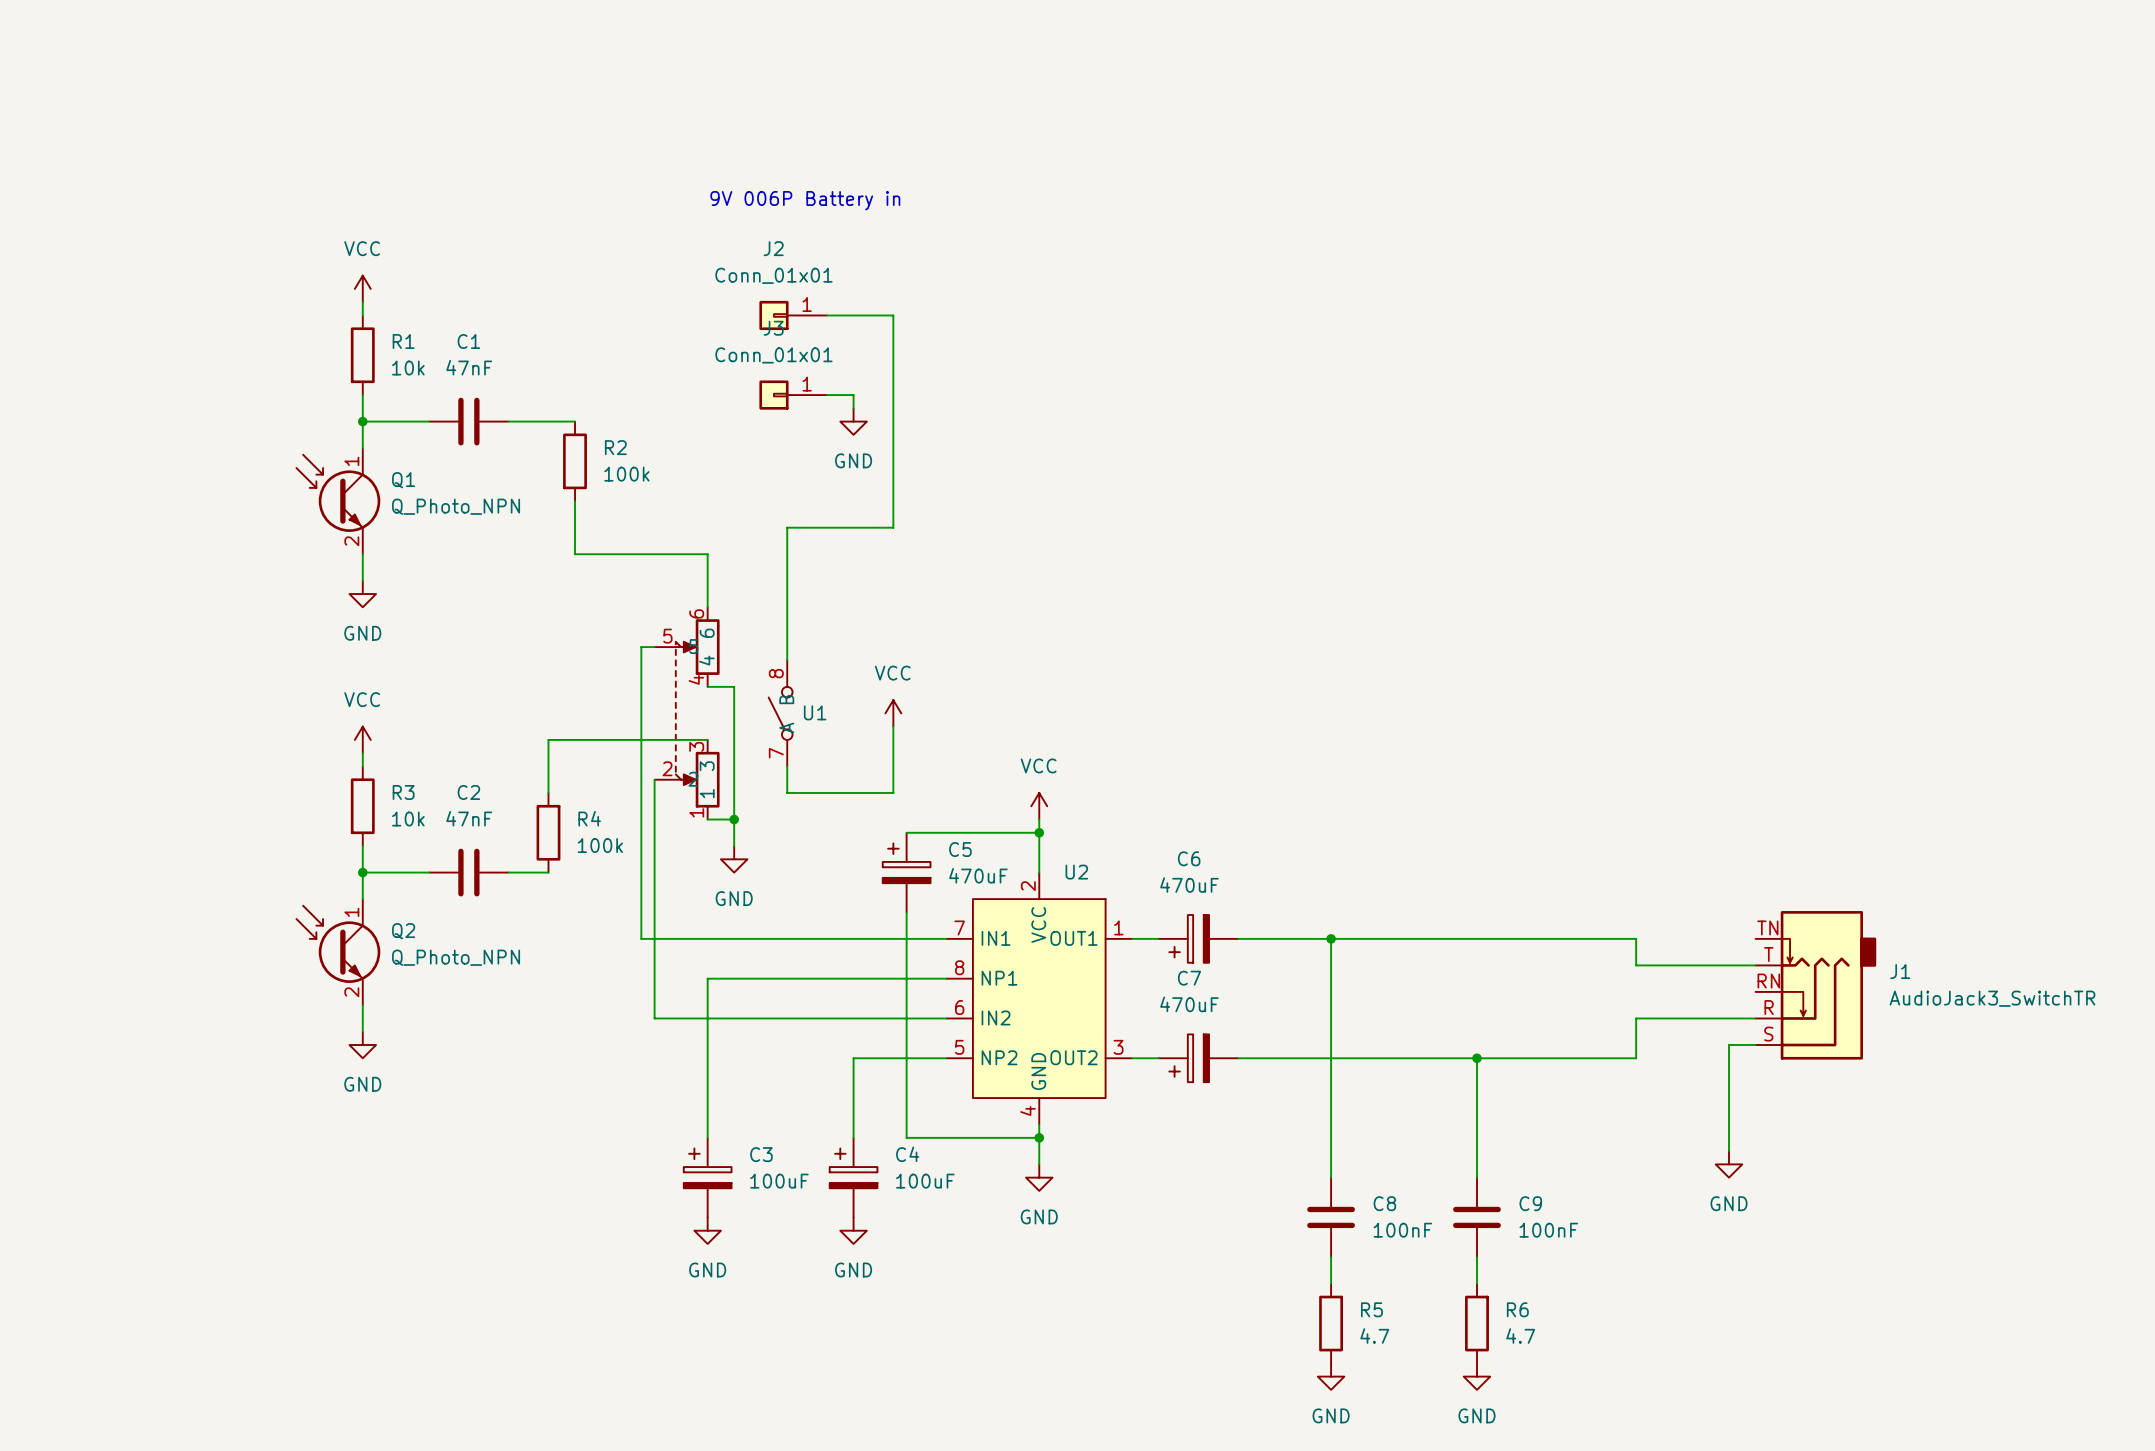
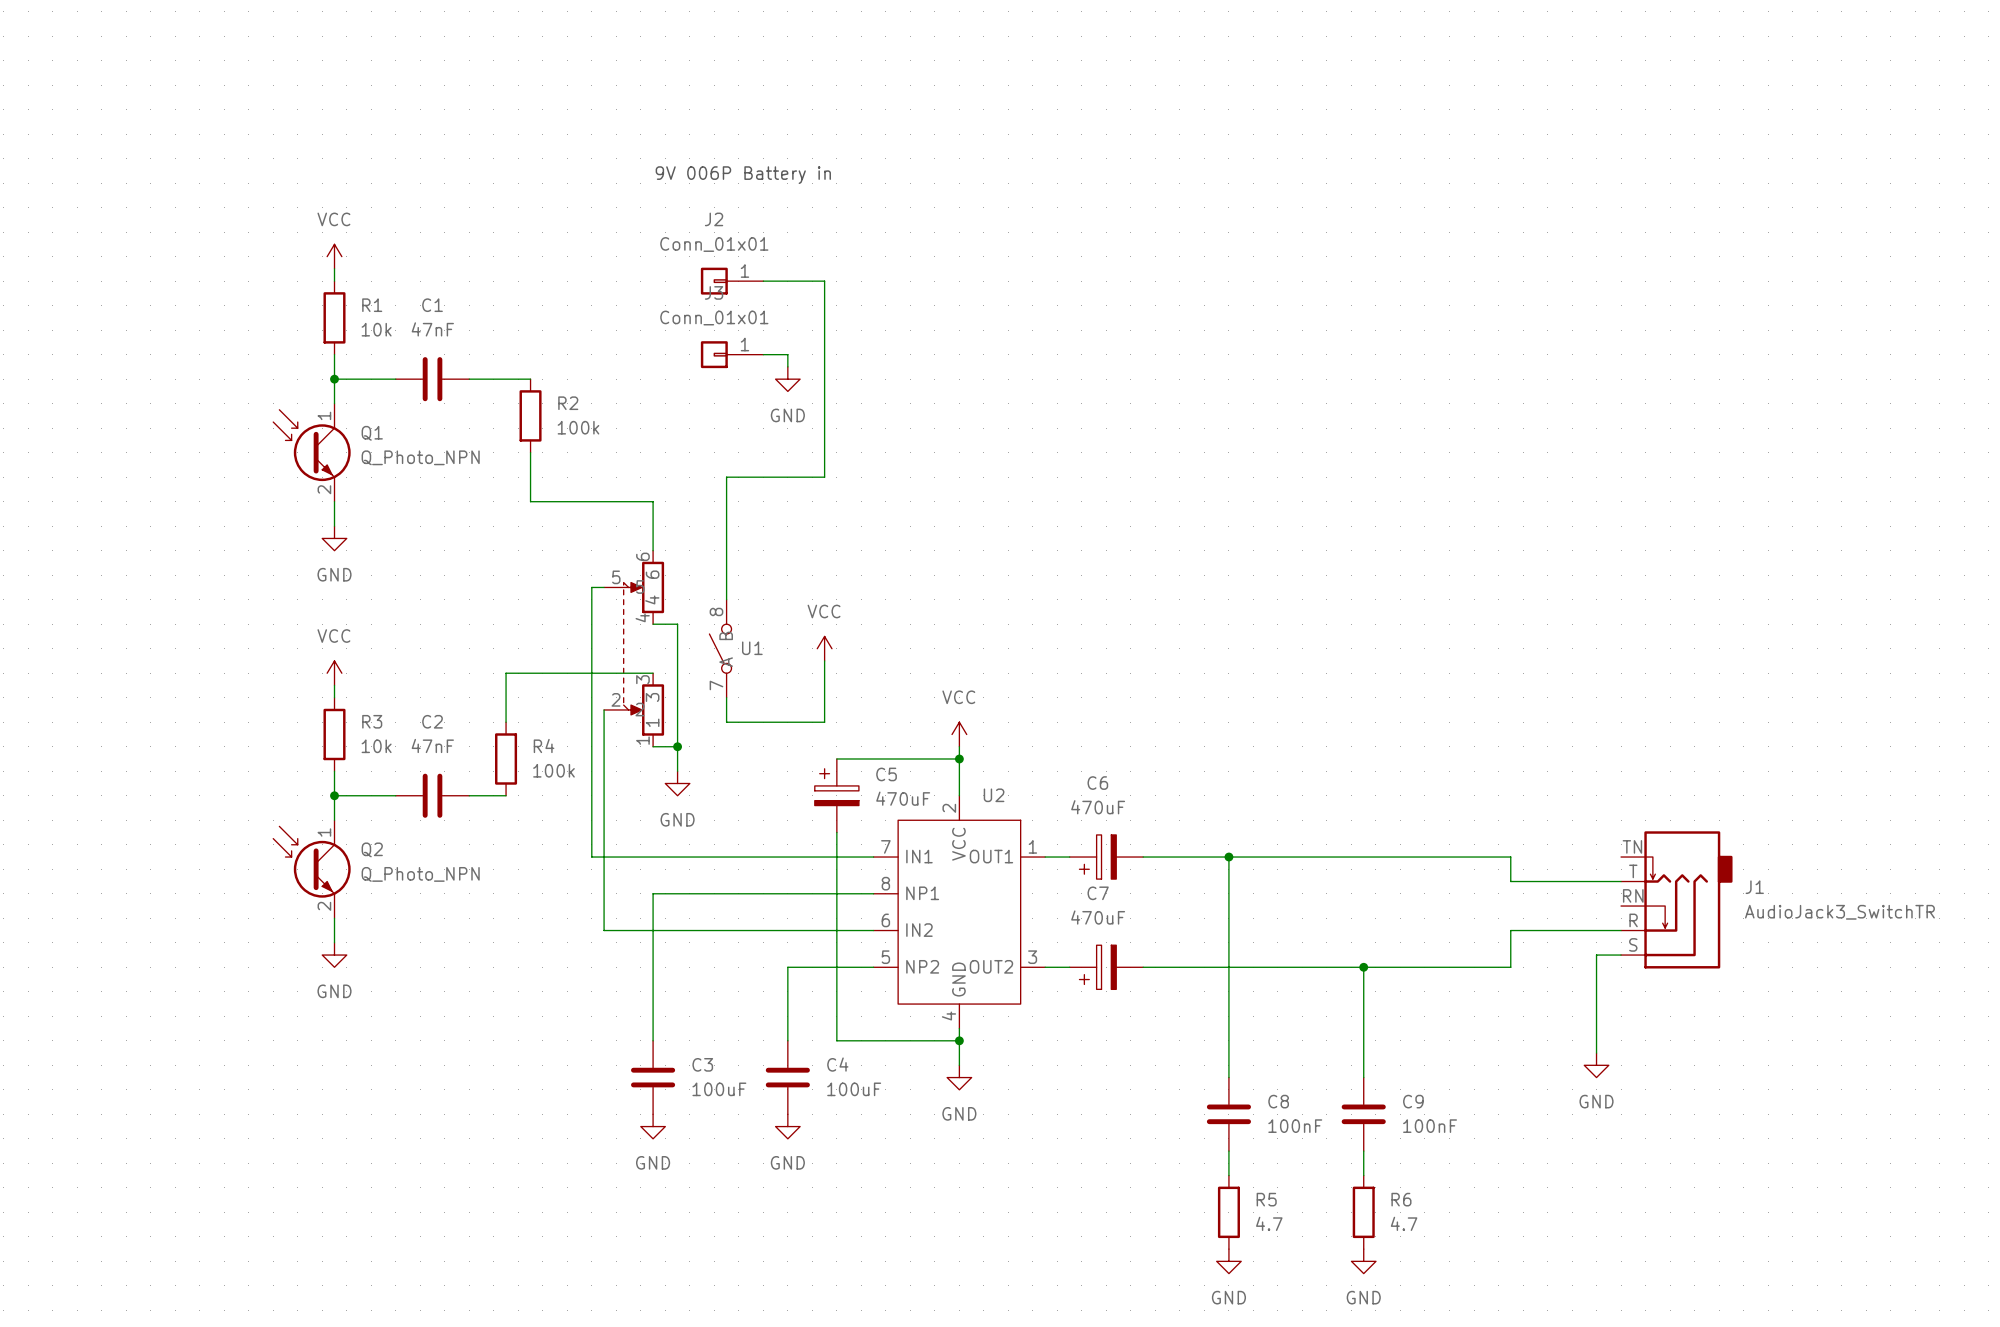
C3 symbol: [683, 1137, 732, 1218] -> [631, 1040, 676, 1115]
C4 symbol: [829, 1137, 878, 1218] -> [765, 1040, 810, 1115]

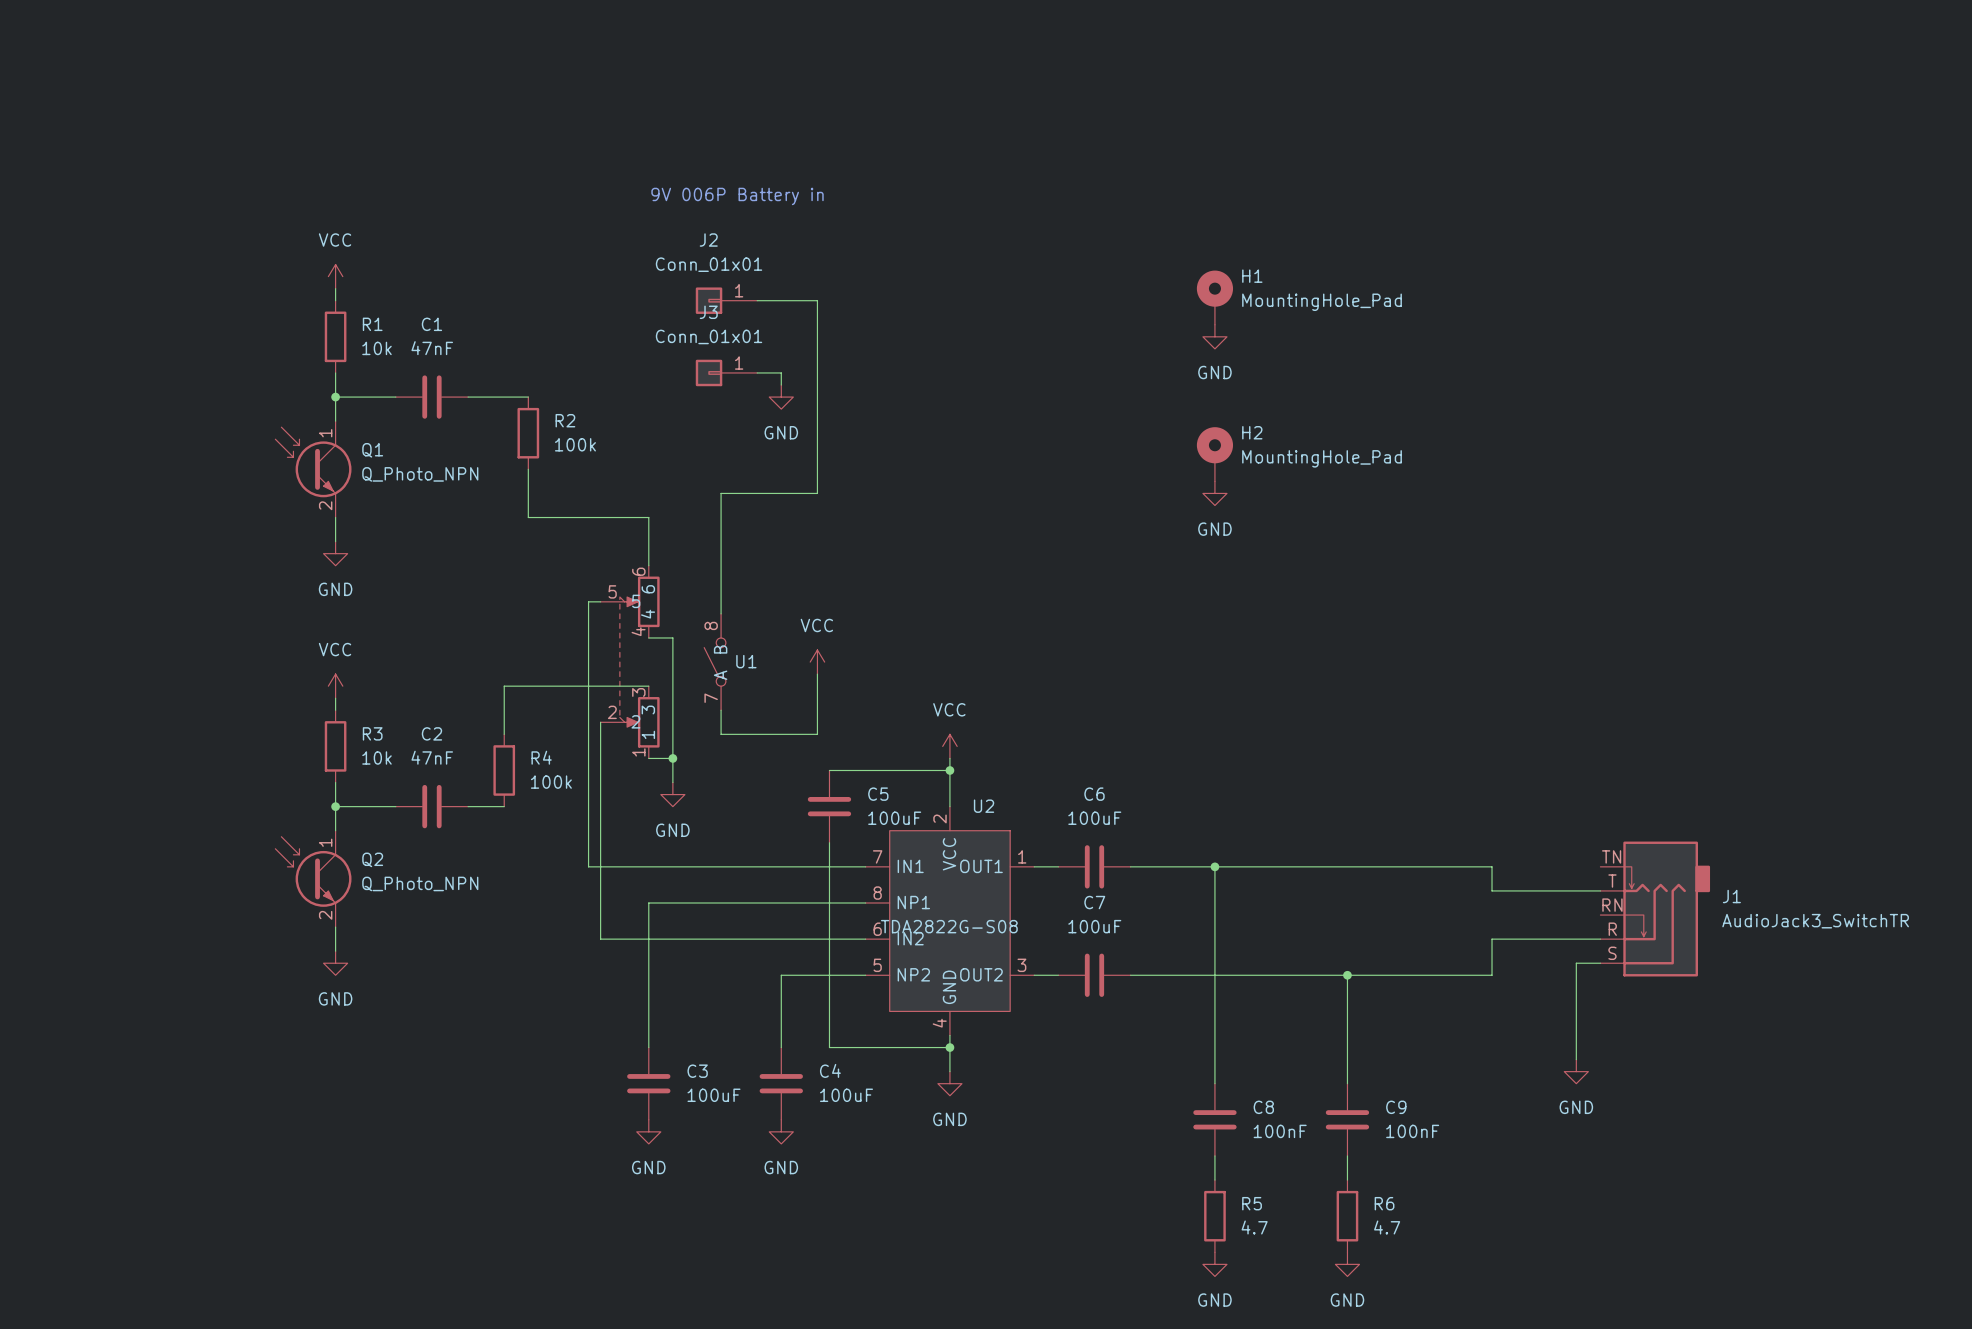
H1: none -> MountingHole_Pad (1214, 297)
power symbol: none -> GND (1214, 336)
H2: none -> MountingHole_Pad (1214, 454)
power symbol: none -> GND (1214, 493)
C5 symbol: [814, 758, 859, 833] -> [807, 770, 852, 843]
C5 value: 470uF (903, 798) -> 100uF (894, 818)
C6 value: 470uF (1098, 807) -> 100uF (1094, 818)
C6 symbol: [1069, 834, 1144, 880] -> [1058, 845, 1131, 889]
U2 value: none -> TDA2822G-S08 (949, 926)
C7 value: 470uF (1098, 917) -> 100uF (1094, 926)
C7 symbol: [1069, 945, 1144, 990] -> [1058, 953, 1131, 997]

